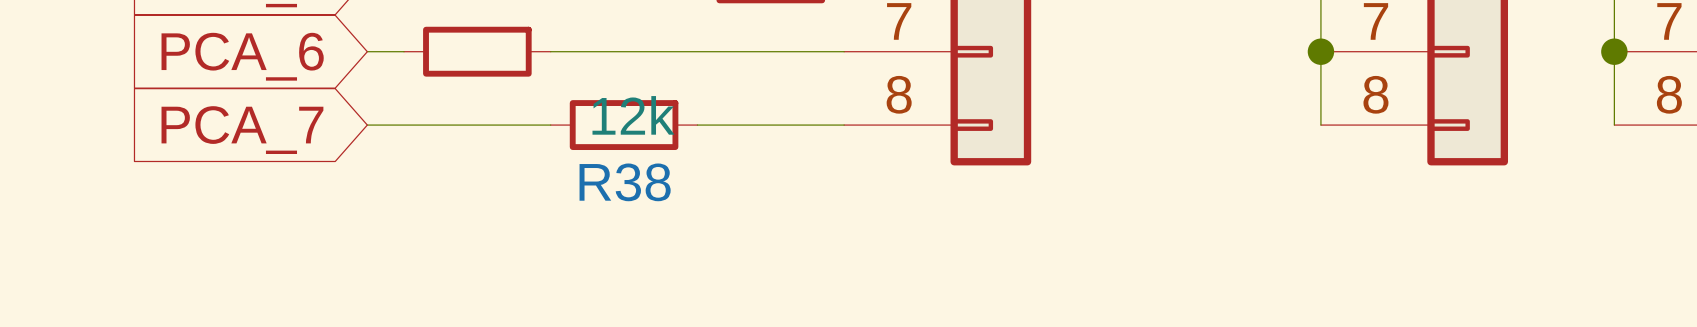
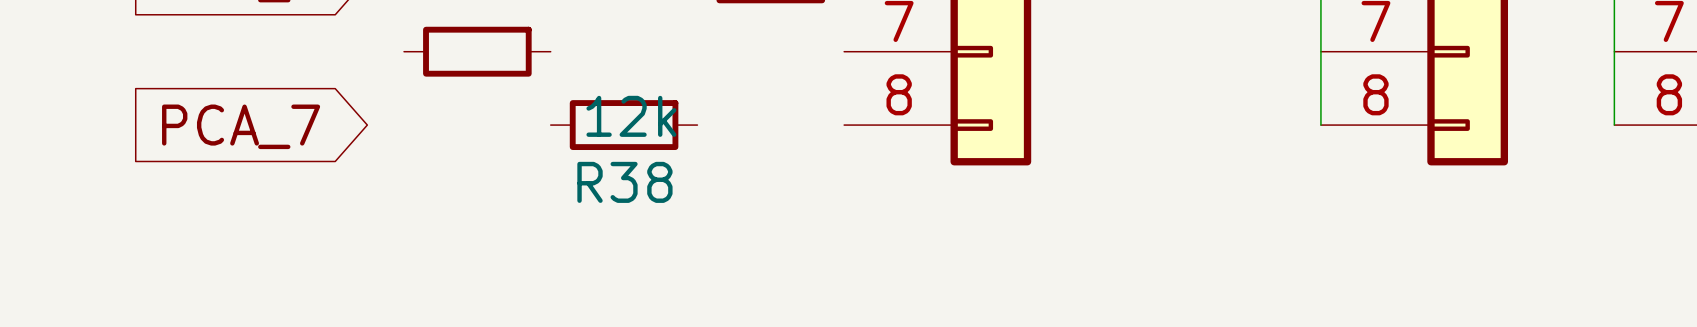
wire: (367, 51) (404, 51) -> none
wire: (550, 51) (844, 51) -> none
junction: (1320, 51) -> none
junction: (1614, 51) -> none
global label: PCA_6 (242, 56) -> none
wire: (367, 125) (550, 125) -> none
wire: (697, 125) (844, 125) -> none

